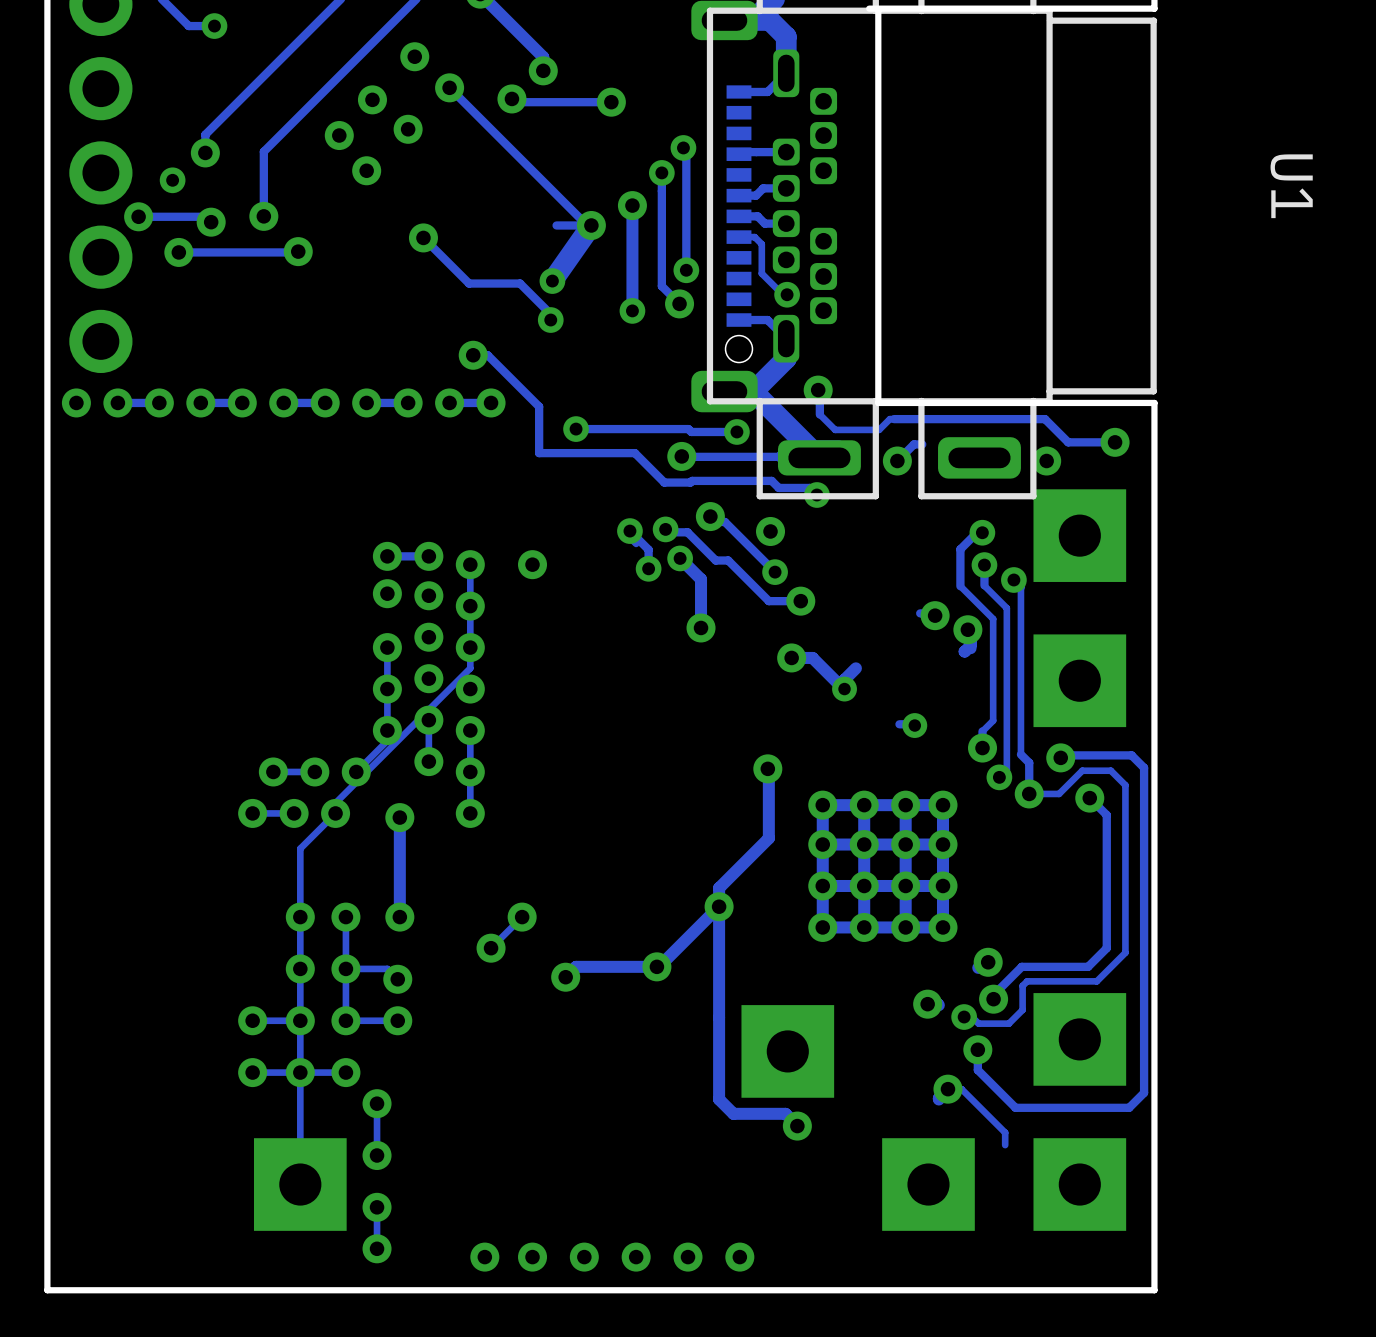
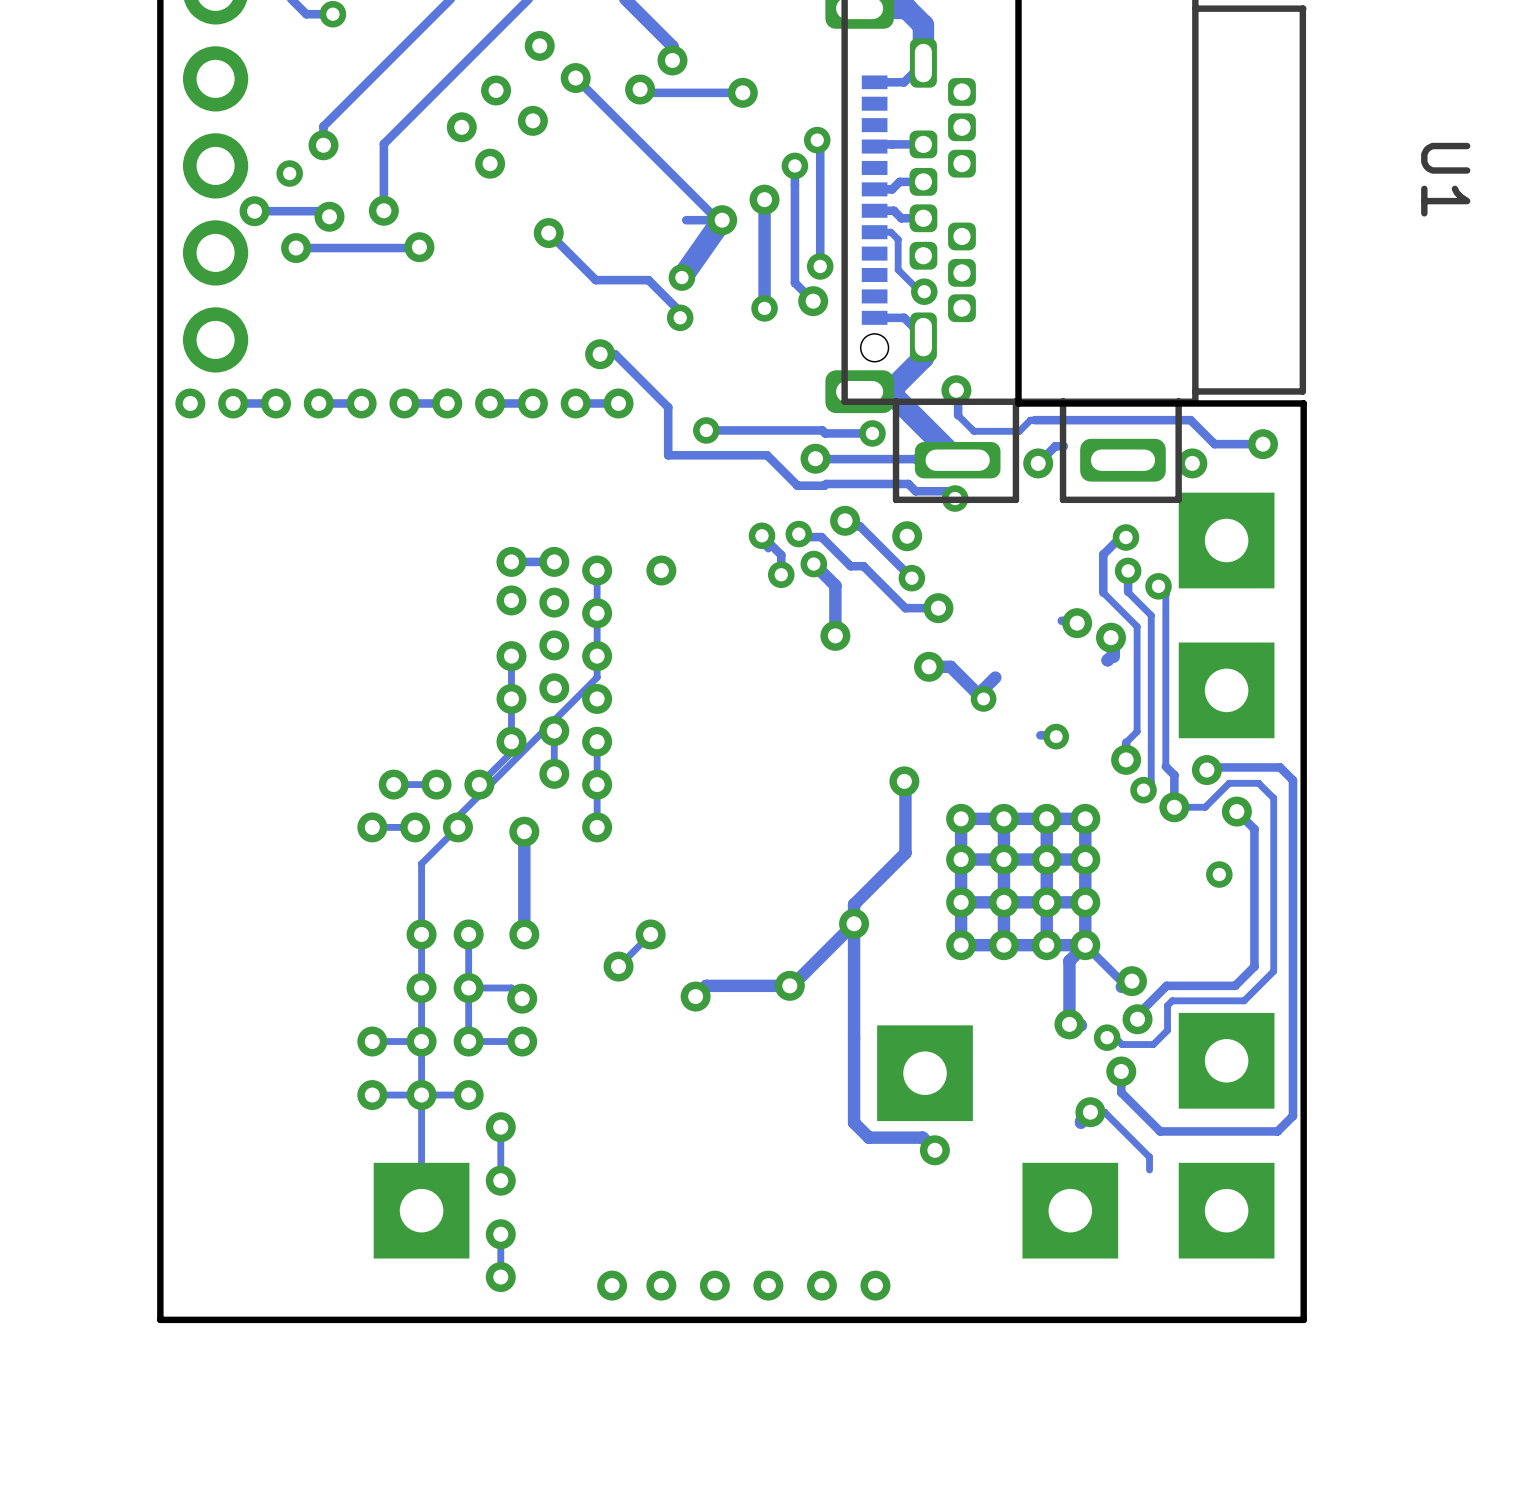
via: none -> (1219, 874)
track: none -> (1131, 981) (1121, 981) (1085, 945) (1069, 961) (1069, 1024)

